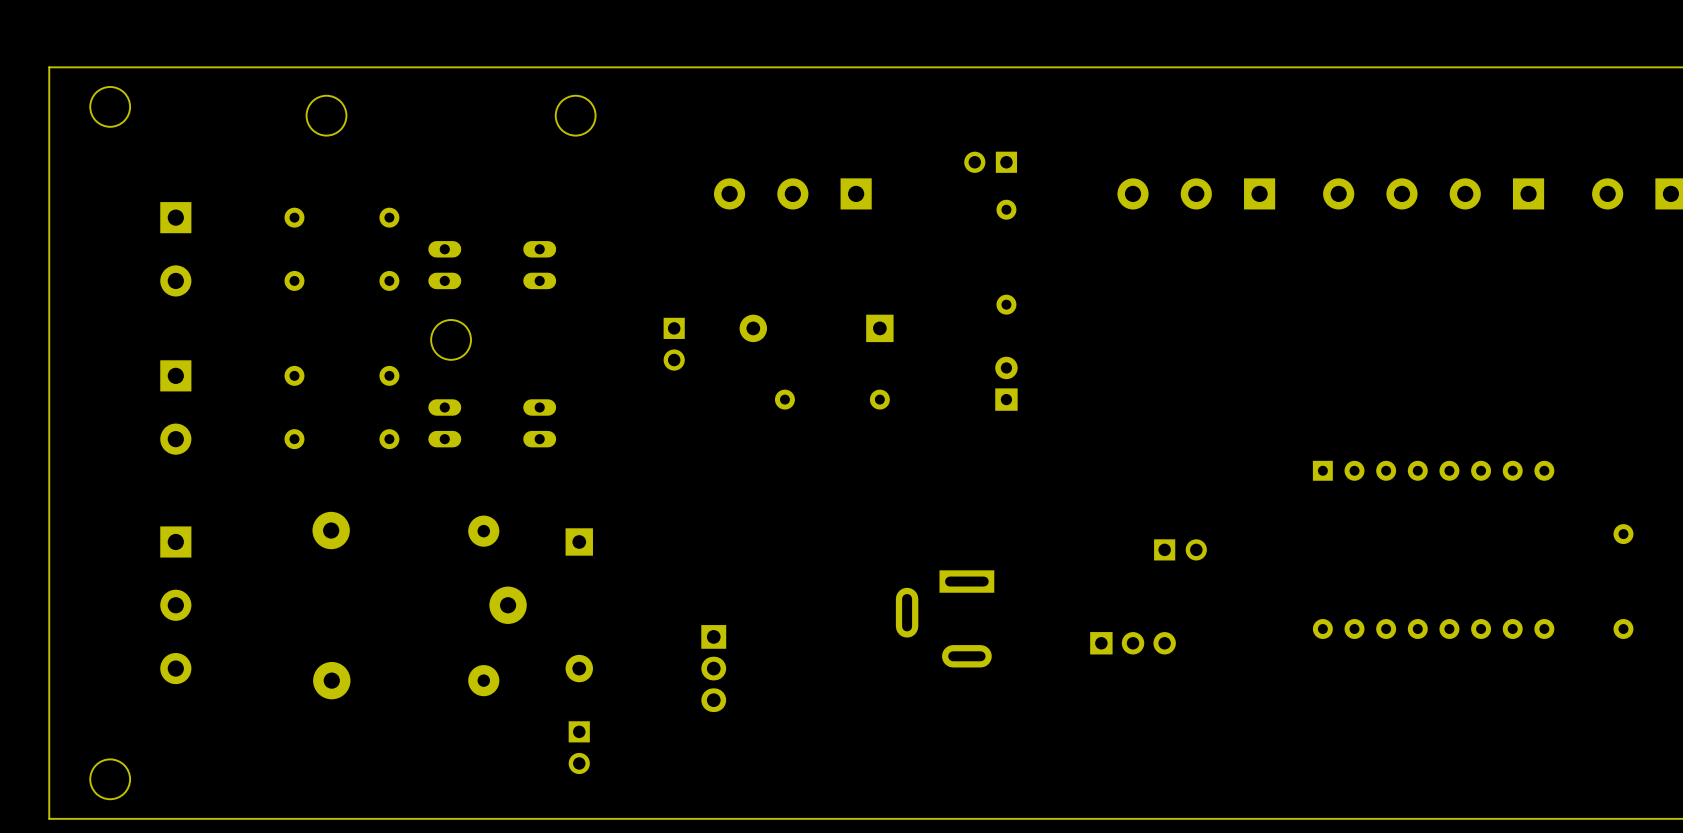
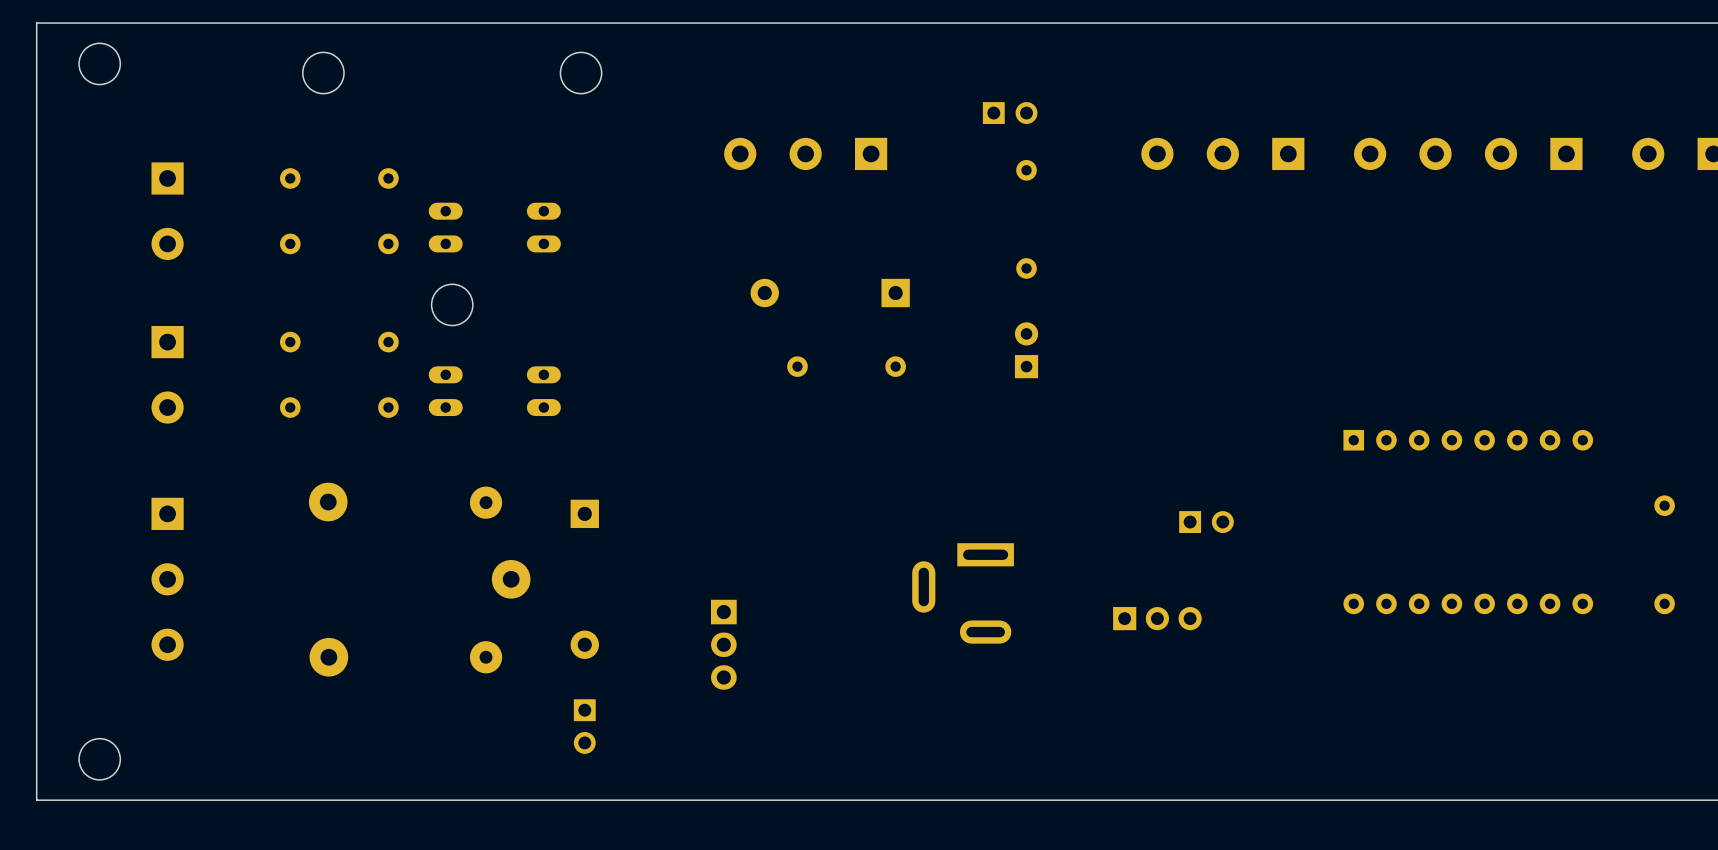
part rotation: 0° (990, 162) -> 180° (1010, 113)
part: (674, 344) -> none

